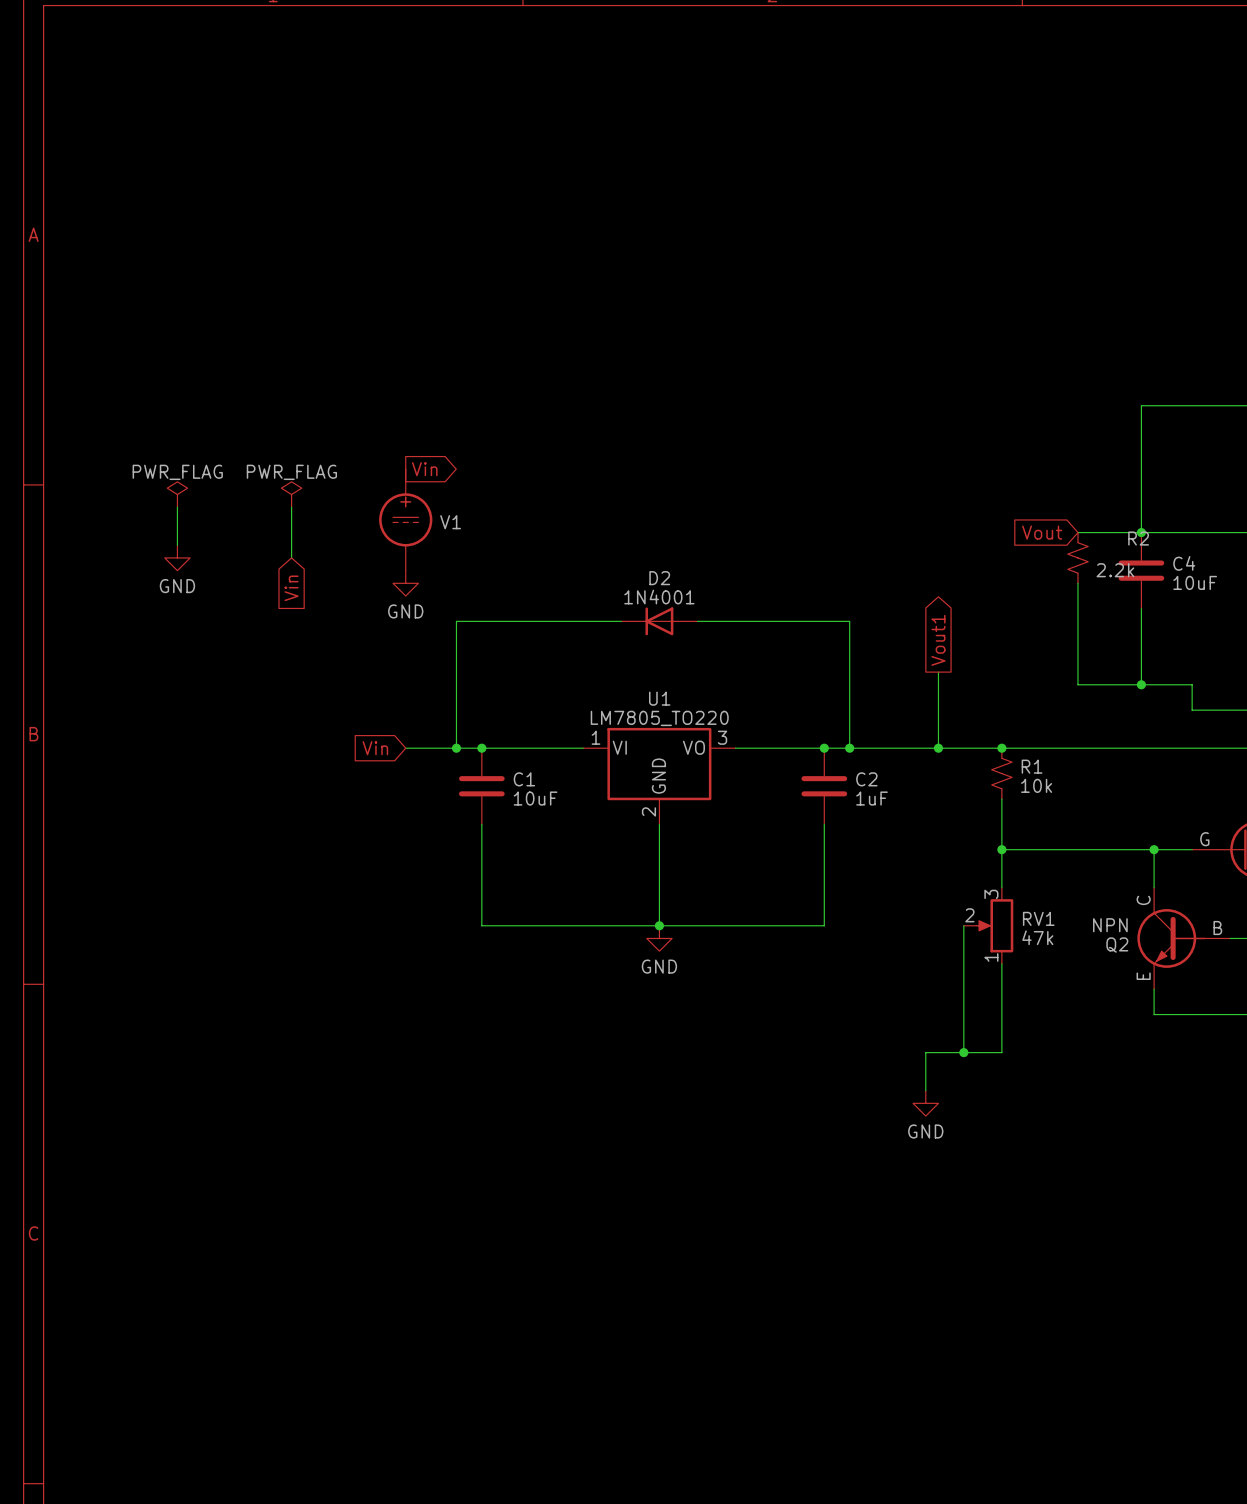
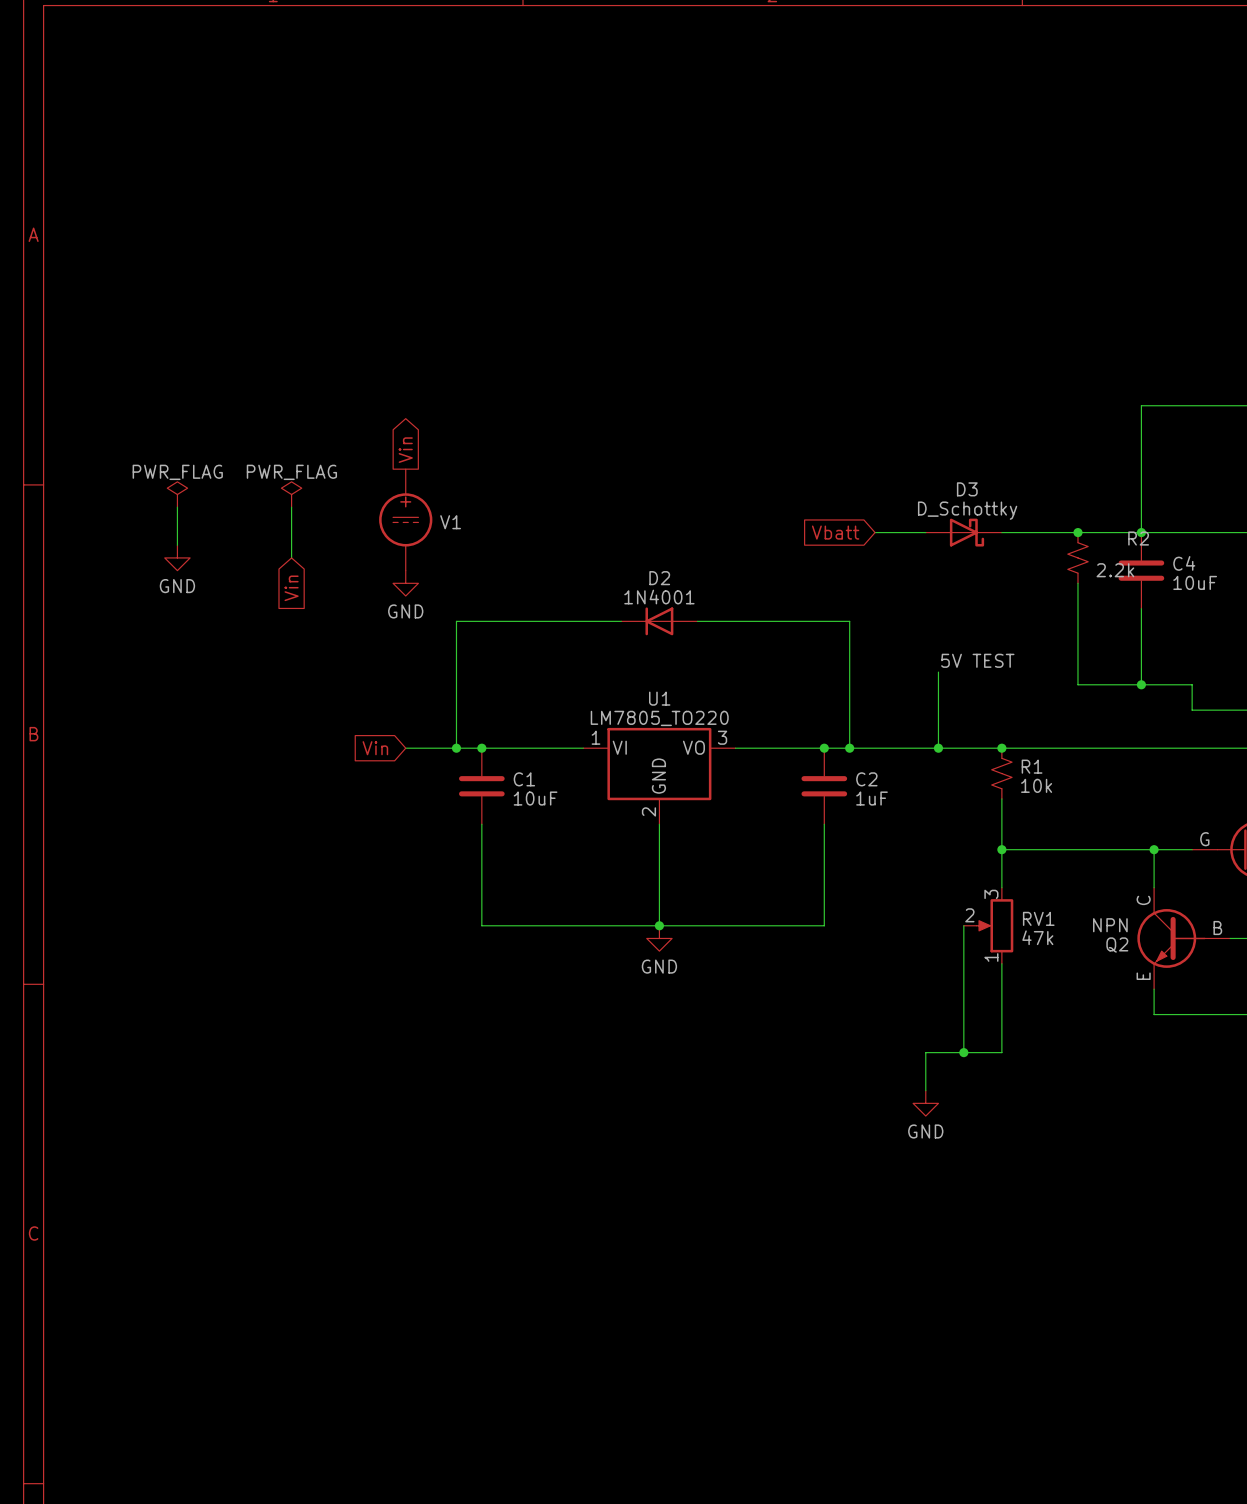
global label rotation: 0° (424, 469) -> 90° counterclockwise (405, 450)
global label: none -> Vbatt (835, 532)
wire: none -> (875, 532) (925, 532)
D3: none -> D_Schottky (963, 532)
wire: none -> (1001, 532) (1077, 532)
global label: Vout (1042, 532) -> none
junction: none -> (1077, 532)
global label: Vout1 (938, 640) -> none
label: none -> 5V TEST (977, 660)

